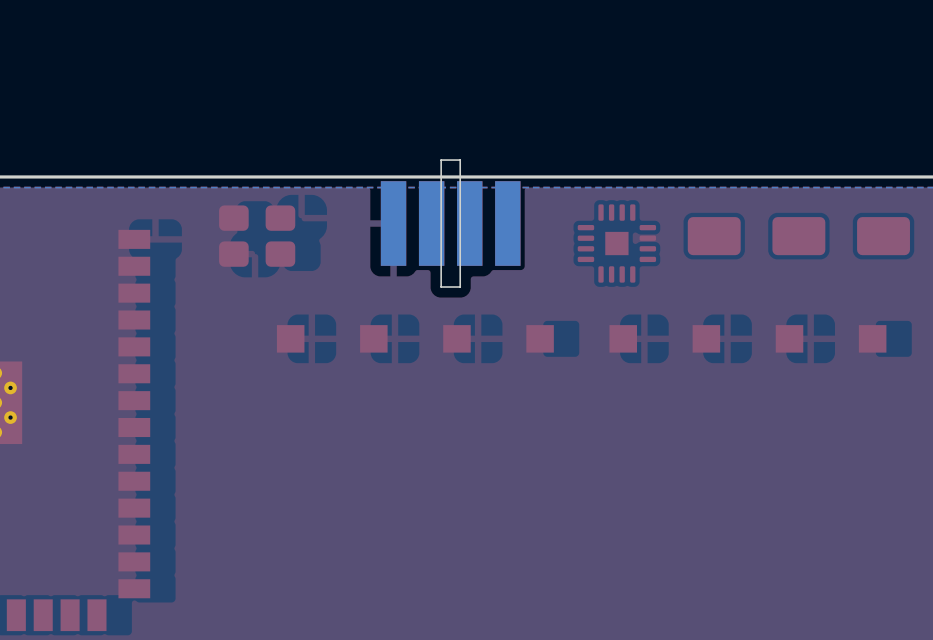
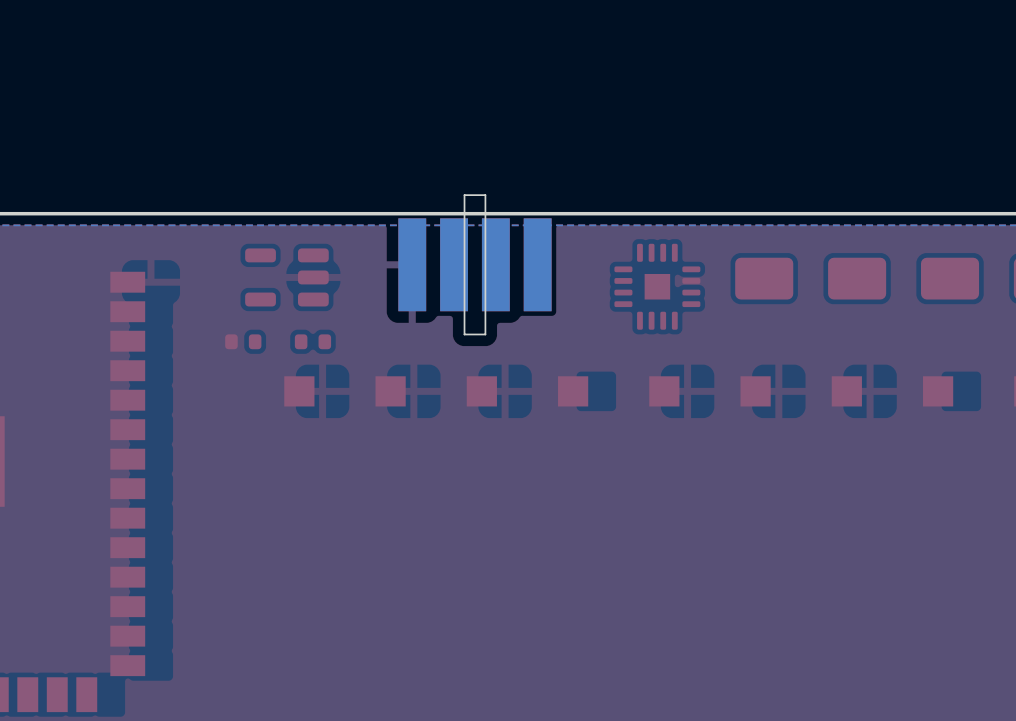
part: none -> (286, 277)
part: (257, 236) -> none
part: none -> (243, 341)
part: none -> (312, 341)

